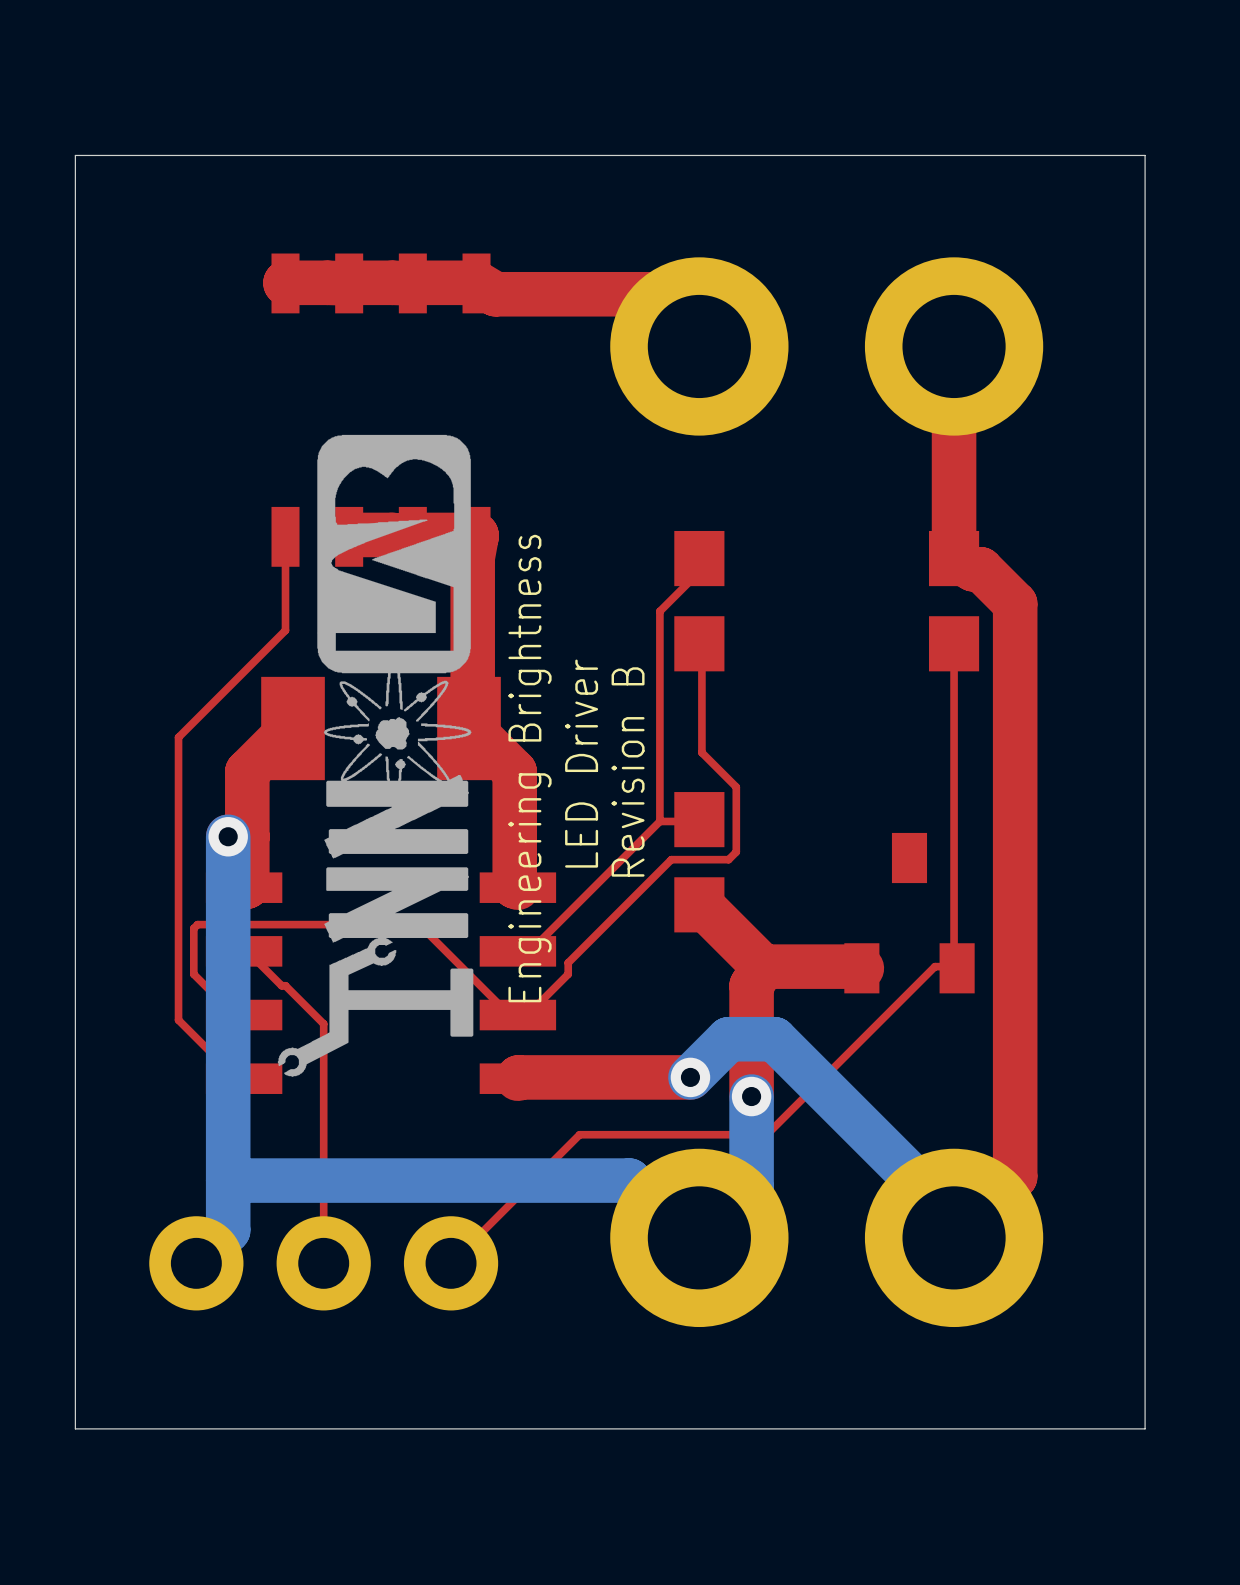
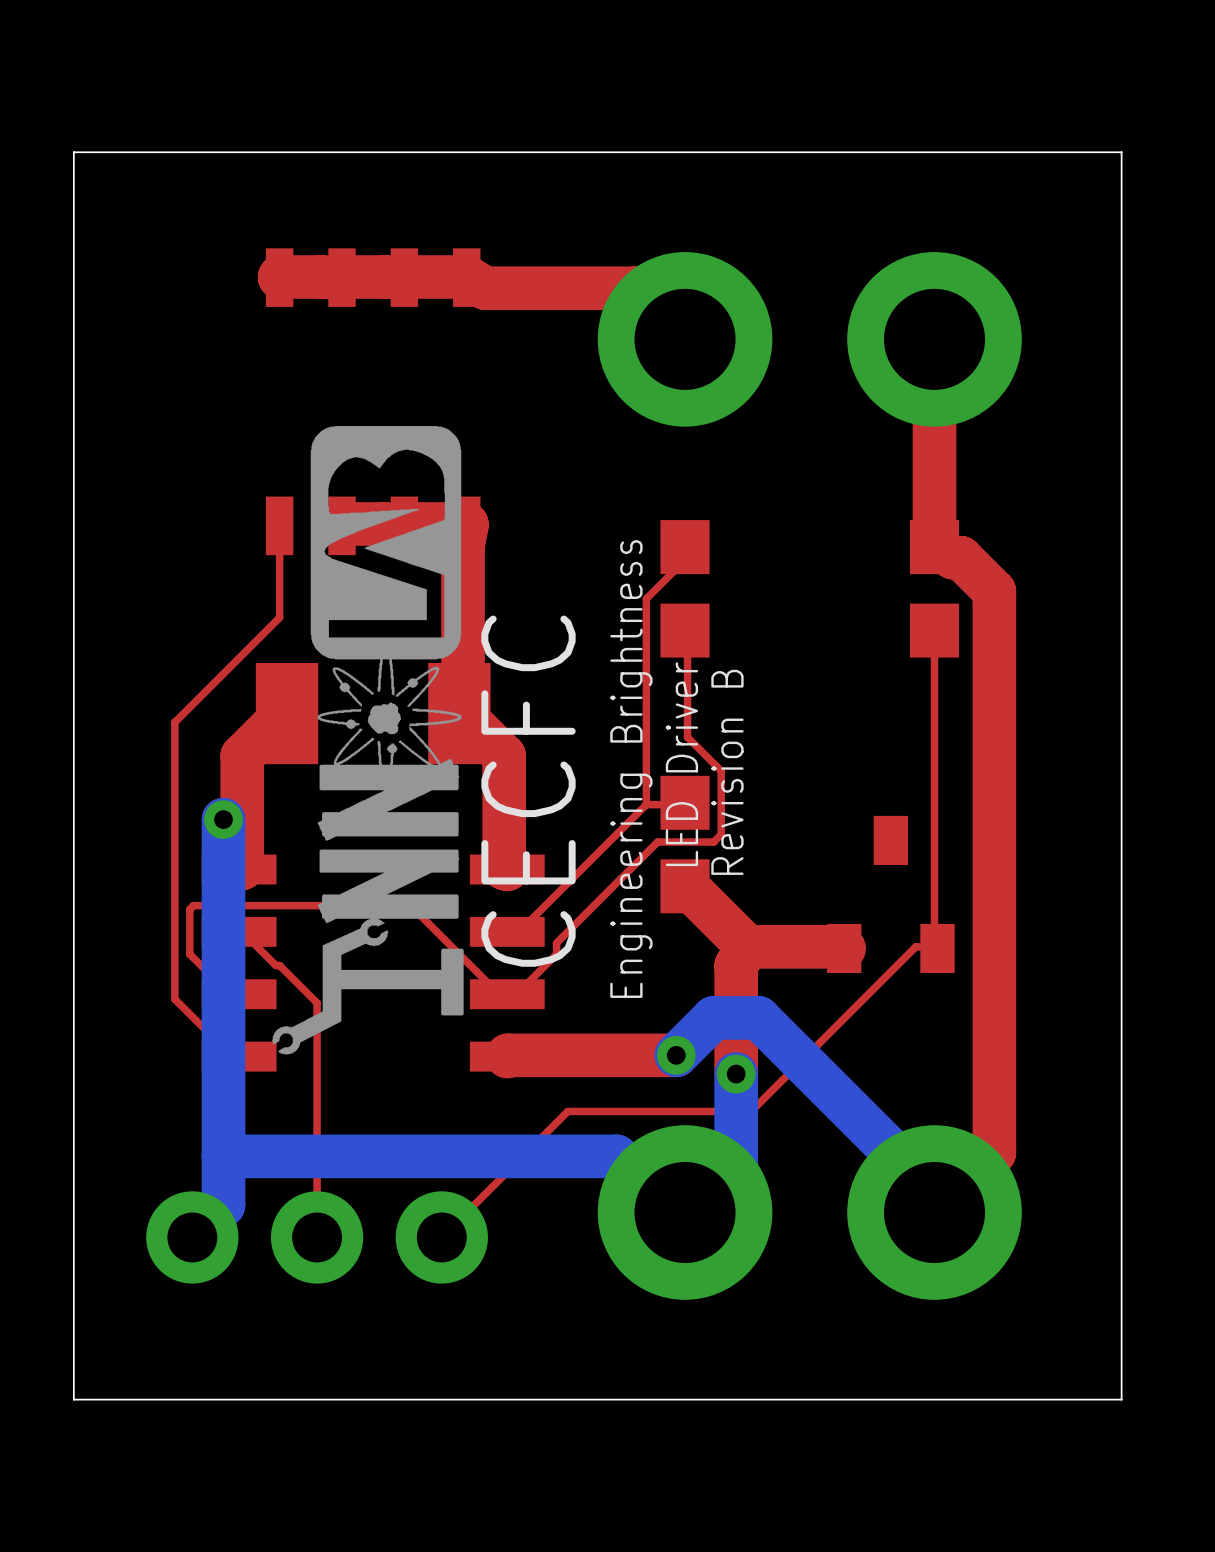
text position: LED Driver (581, 763) -> LED Driver (681, 764)
text position: Engineering Brightness (530, 768) -> Engineering Brightness (631, 769)
text position: Revision B (628, 771) -> Revision B (727, 772)
text: none -> CECFC (528, 791)

